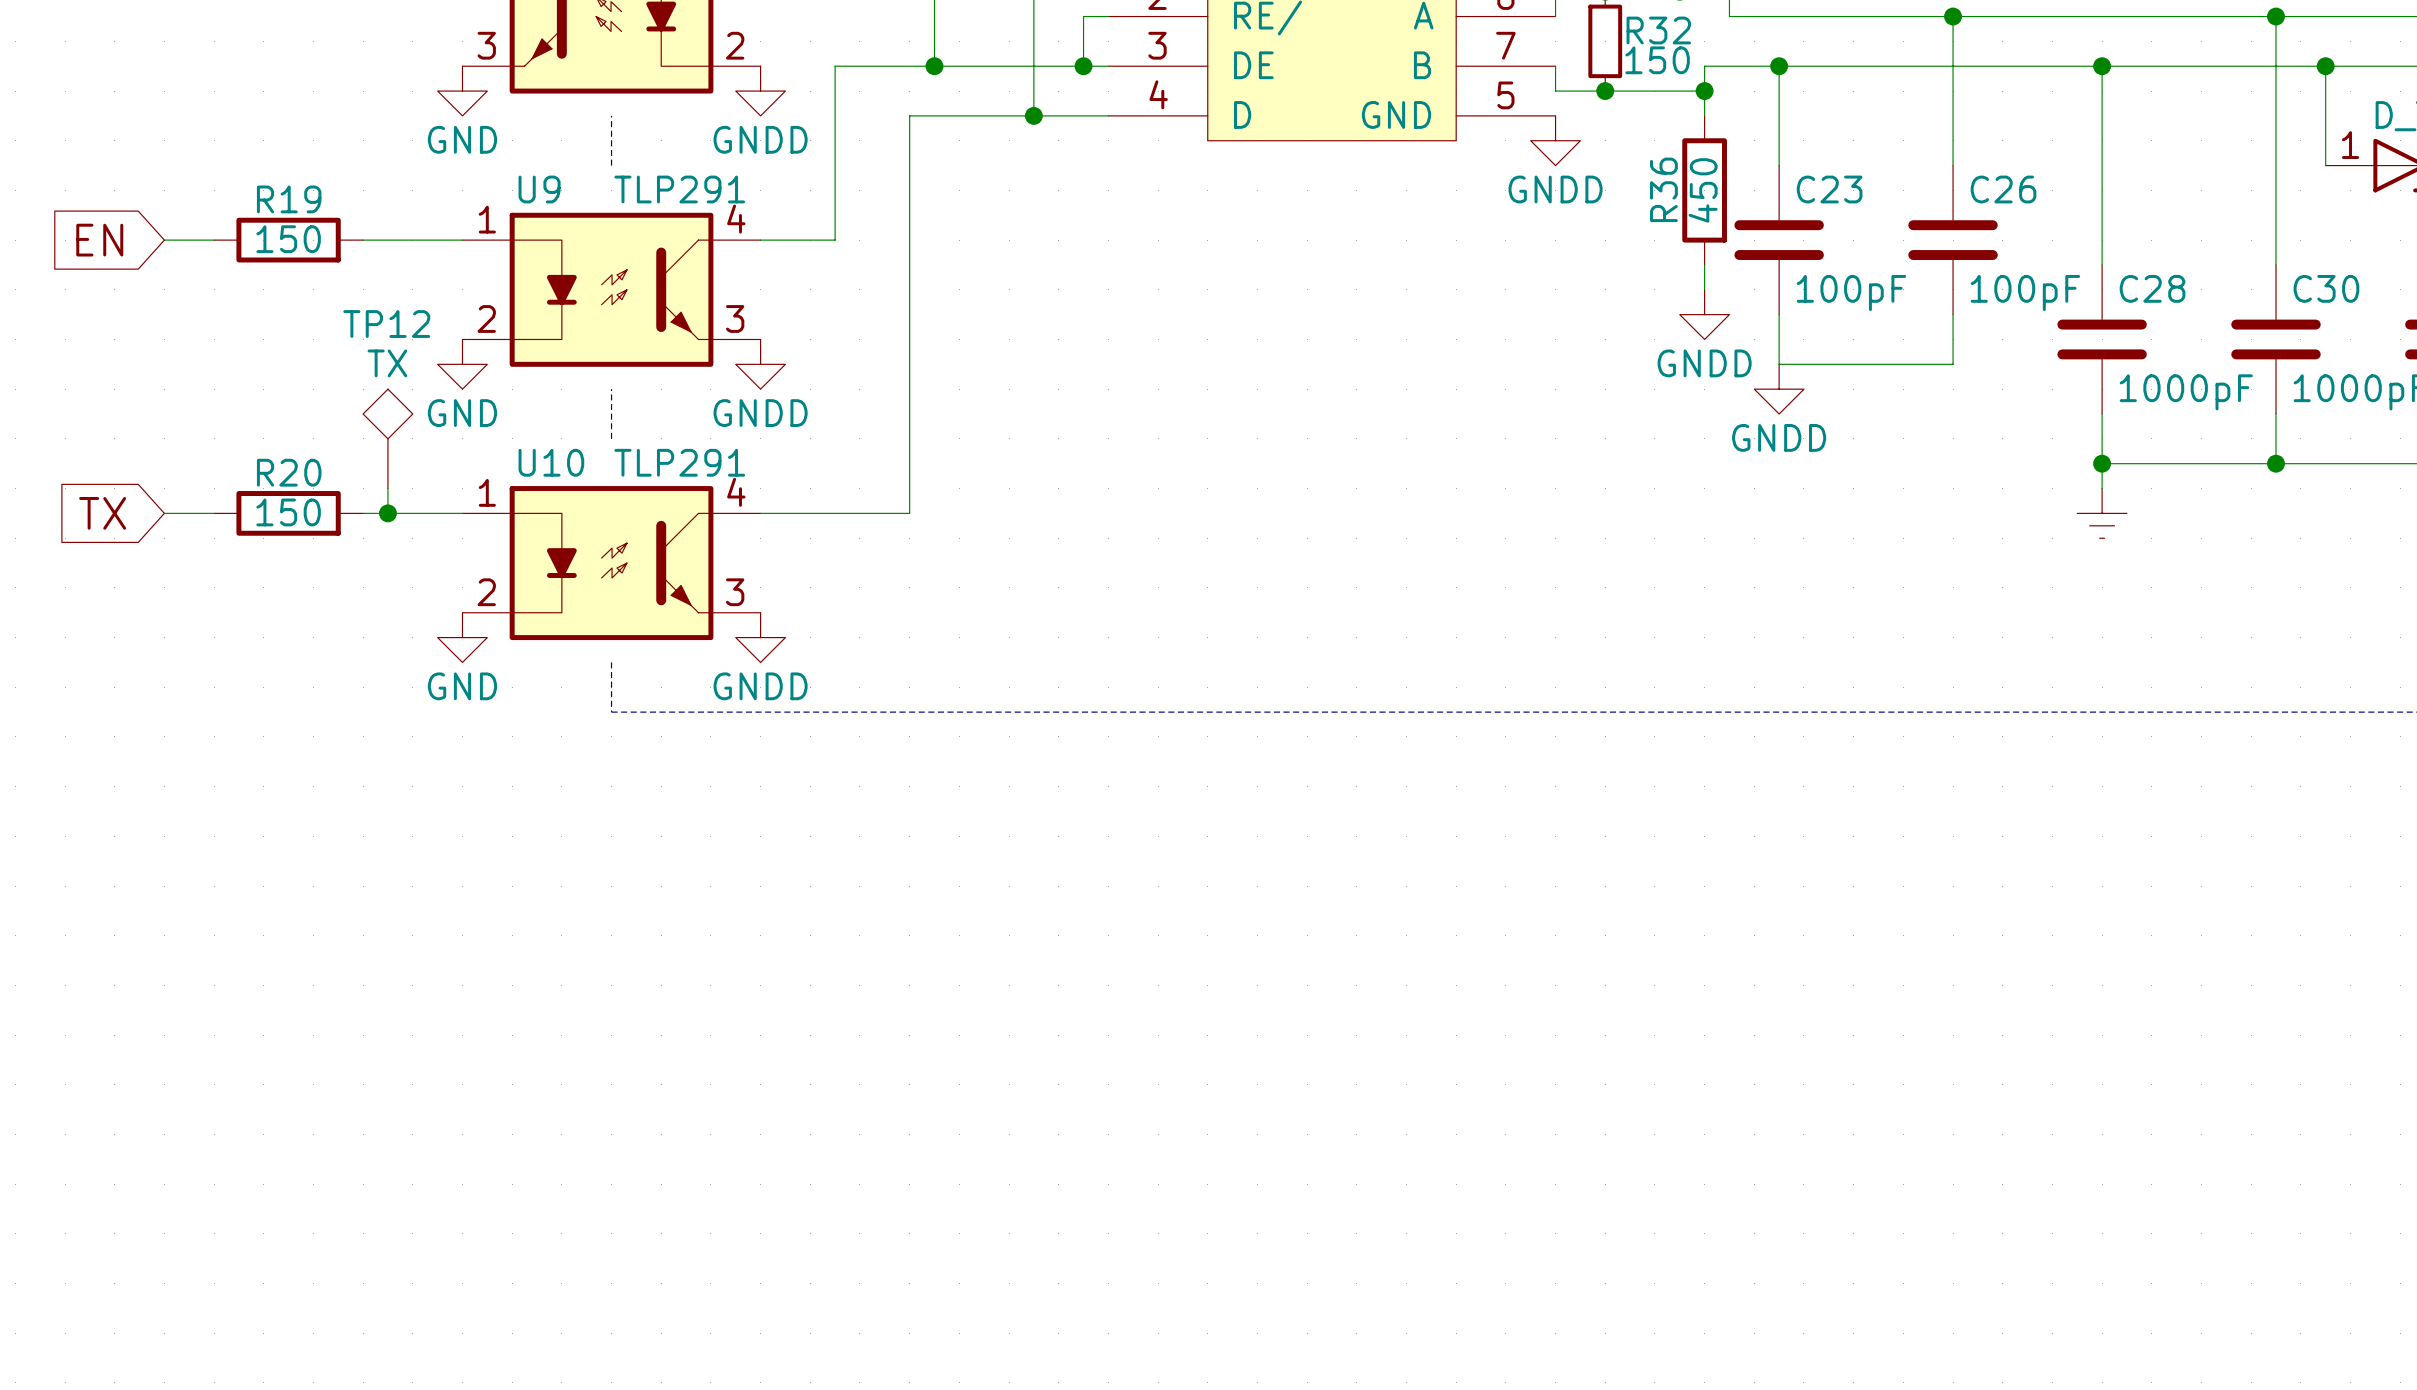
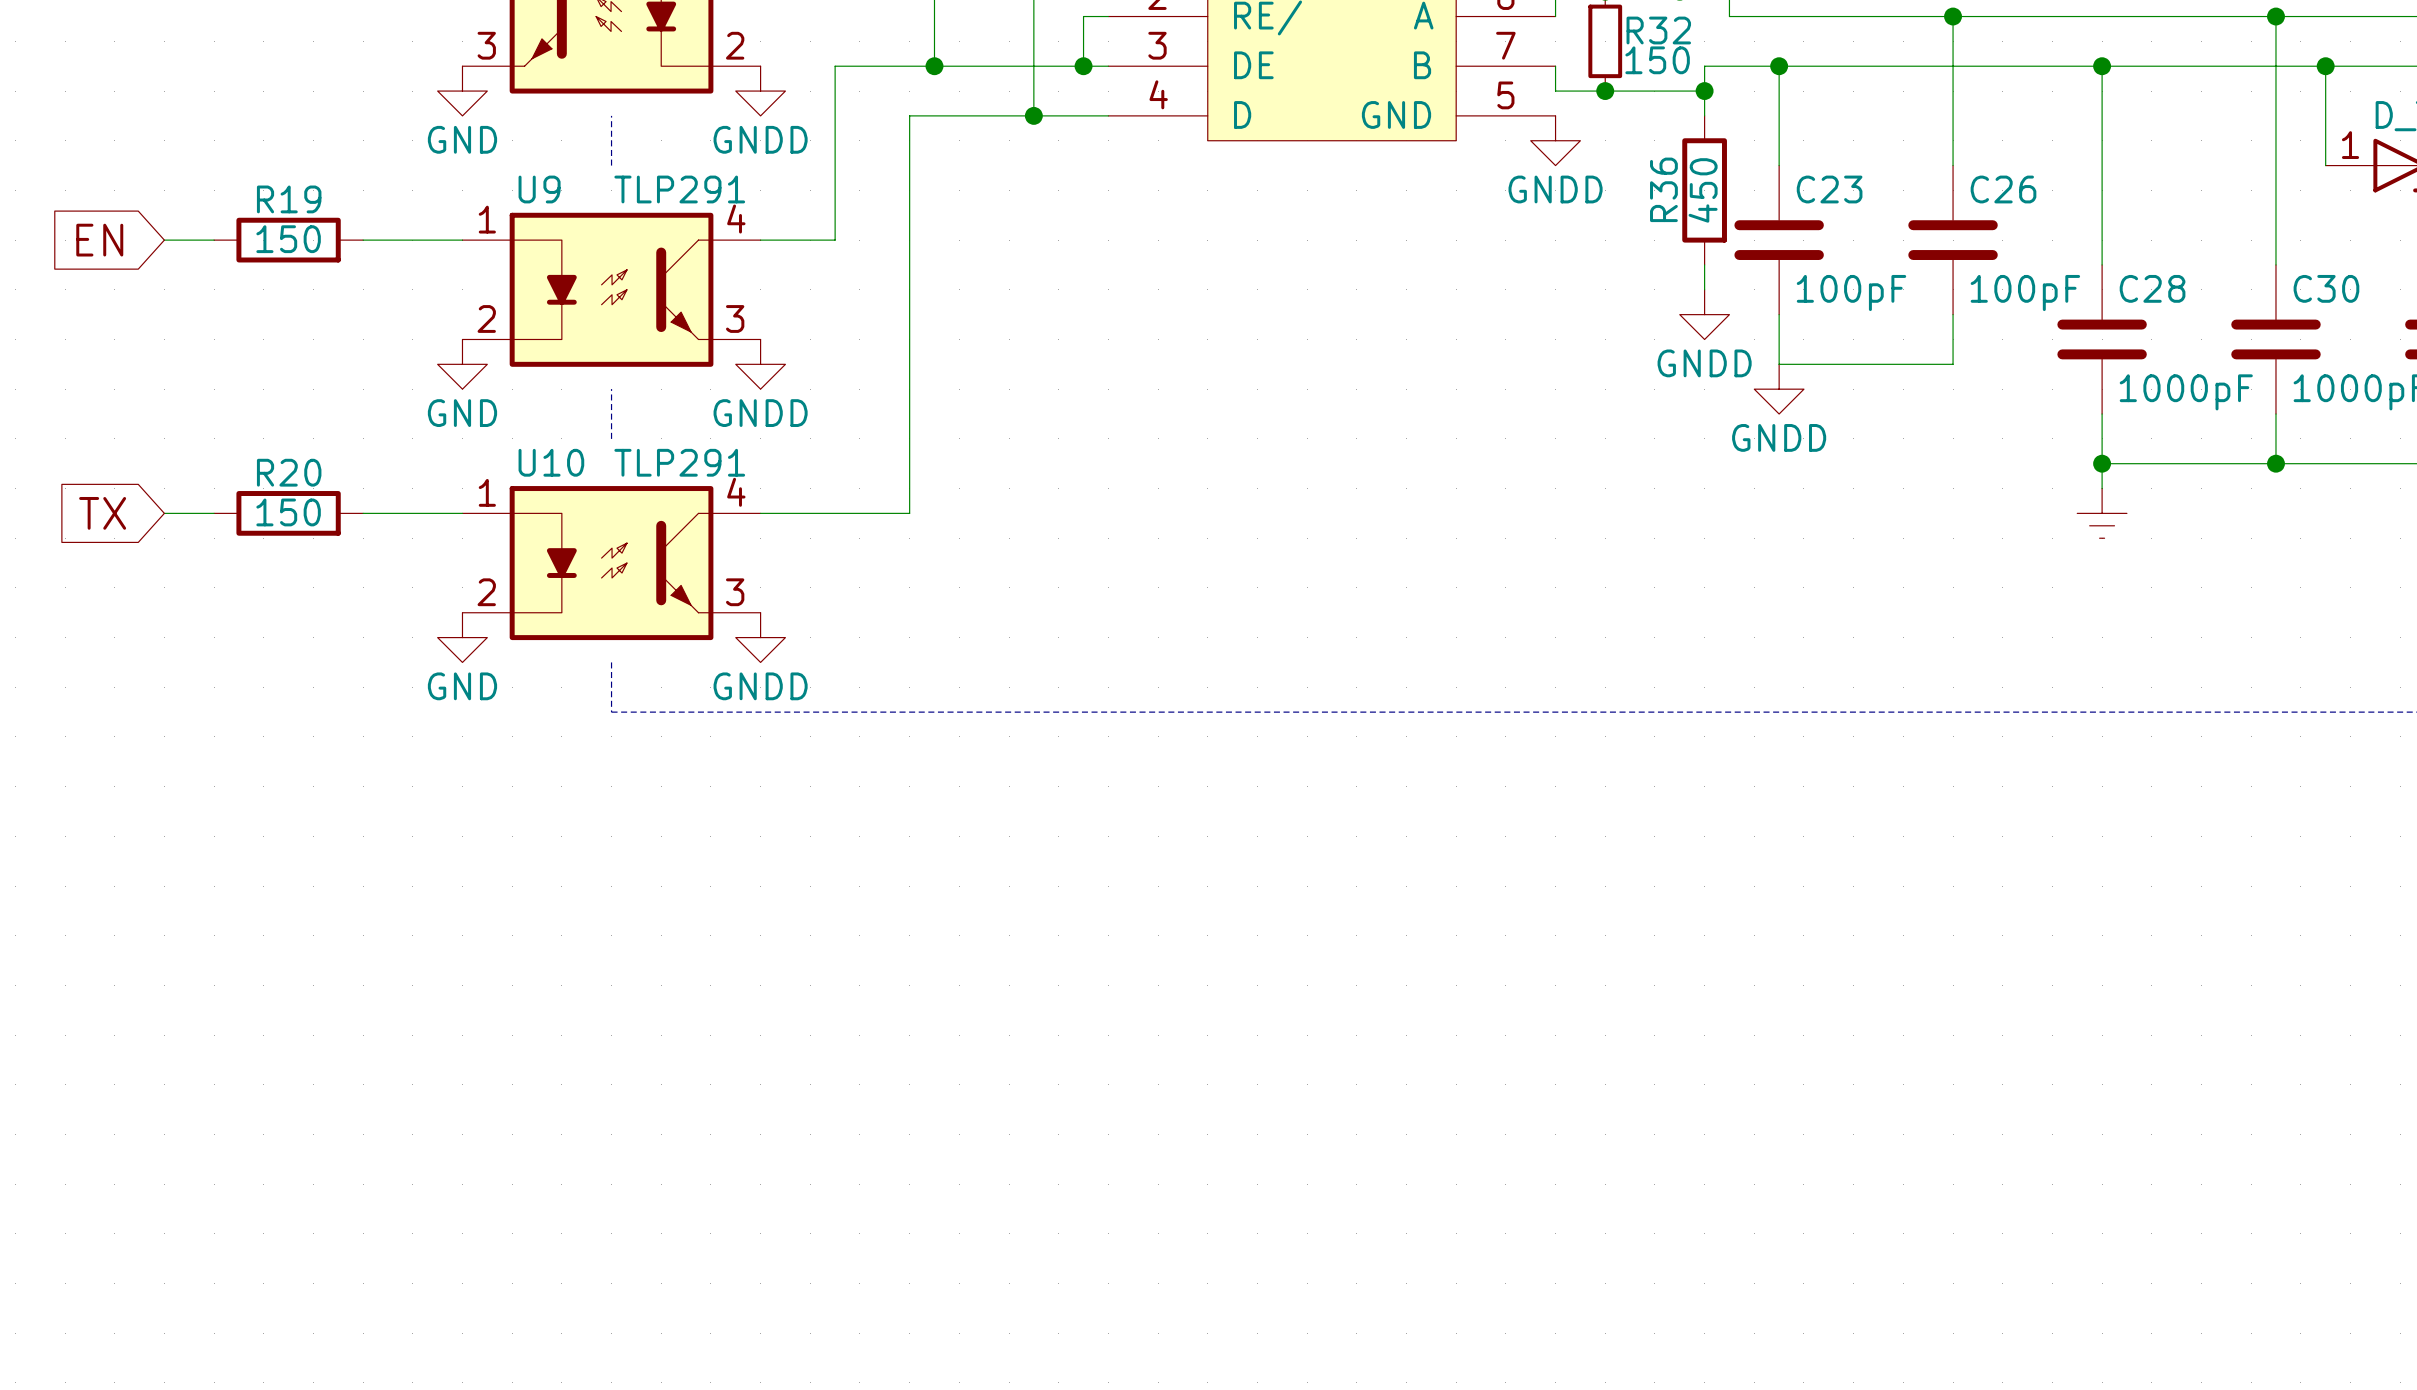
TP12: TX (387, 438) -> none
wire: (387, 488) (387, 513) -> none
junction: (387, 513) -> none

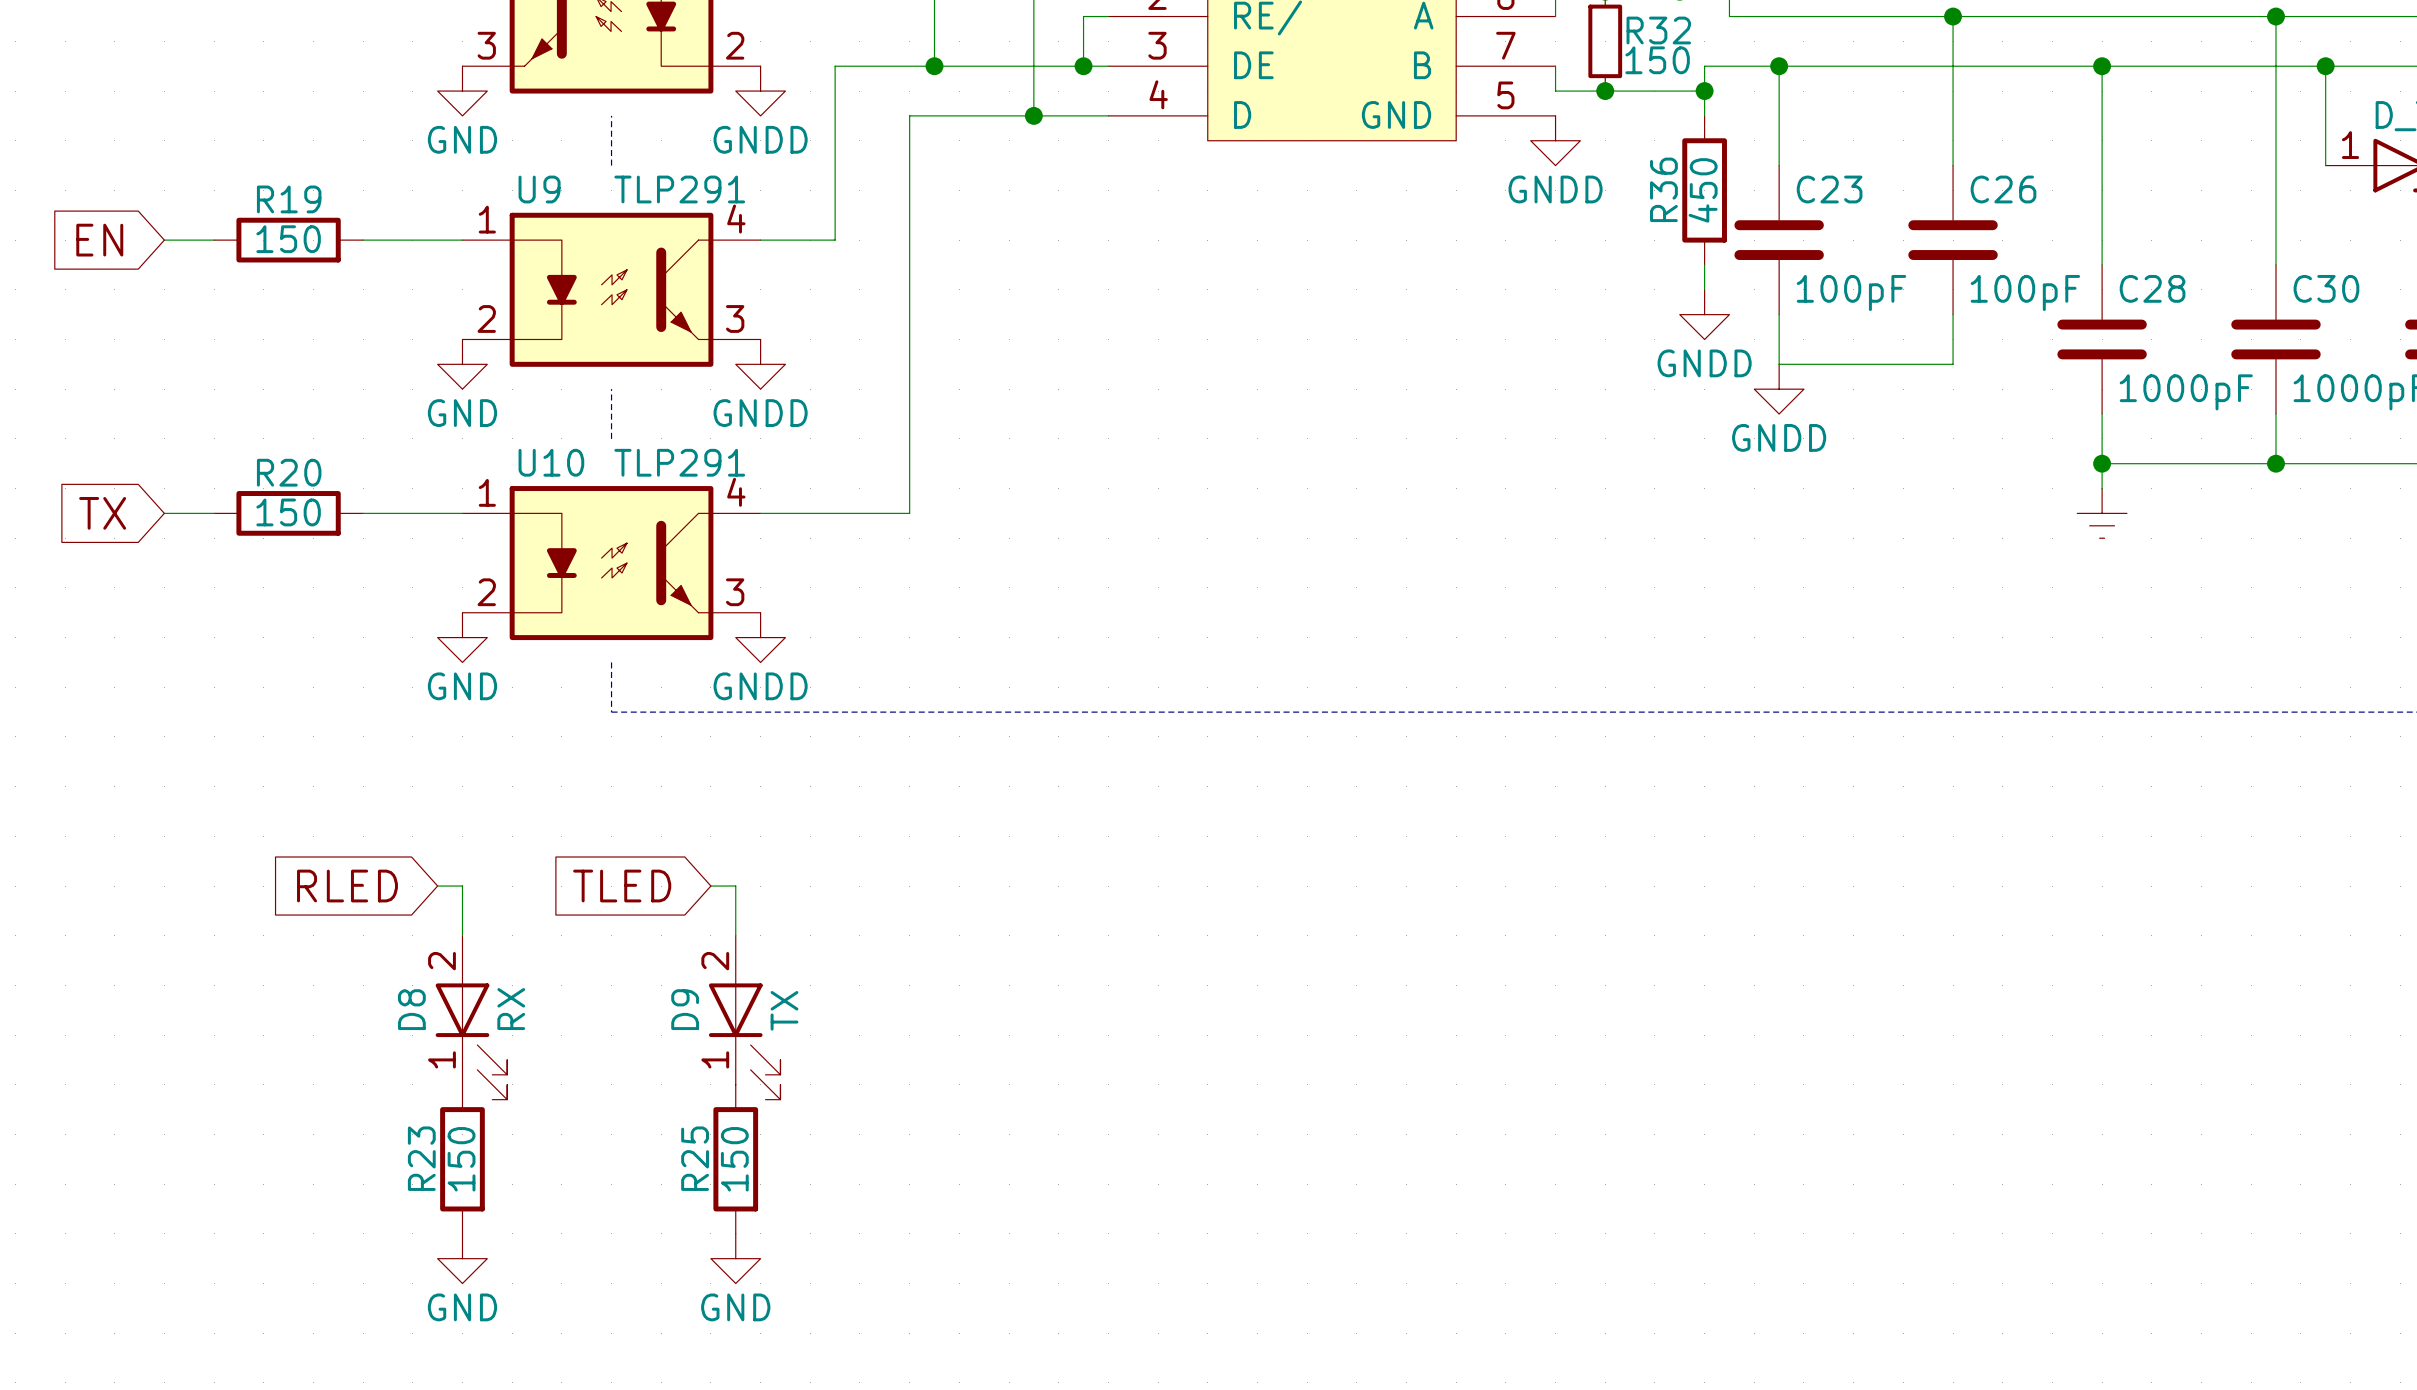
global label: none -> RLED (347, 886)
wire: none -> (437, 886) (462, 886) (462, 935)
global label: none -> TLED (622, 886)
wire: none -> (710, 886) (735, 886) (735, 935)
D8: none -> RX (471, 1017)
D9: none -> TX (744, 1017)
R23: none -> 150 (462, 1159)
R25: none -> 150 (735, 1159)
power symbol: none -> GND (462, 1258)
power symbol: none -> GND (735, 1258)

